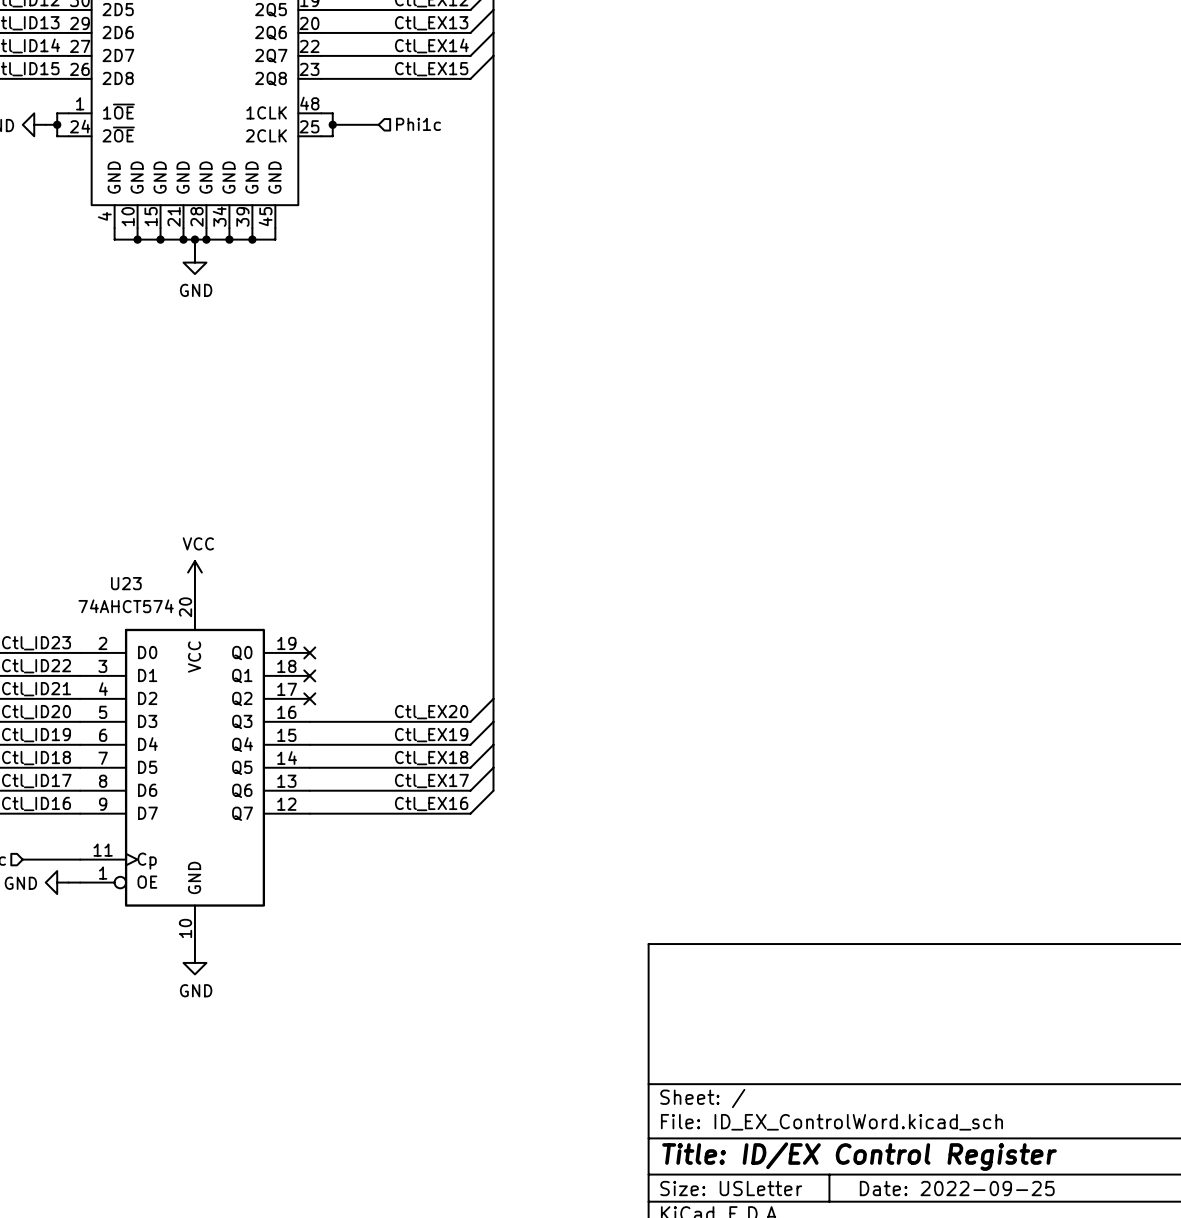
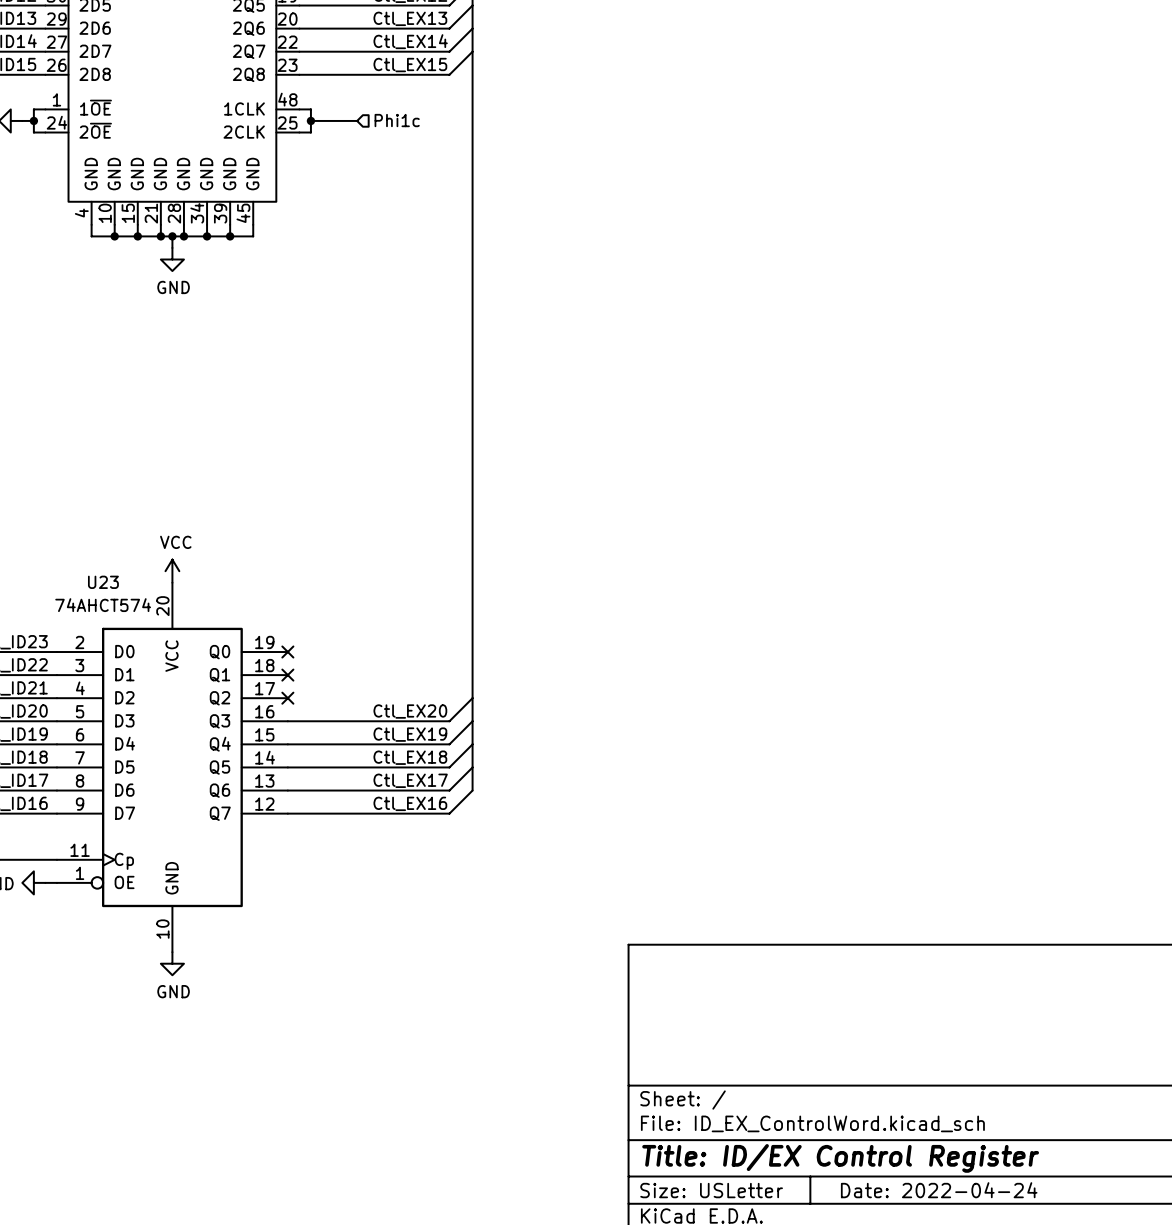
title block: Date: 2022-09-25 (957, 1188) -> Date: 2022-04-24 (939, 1190)

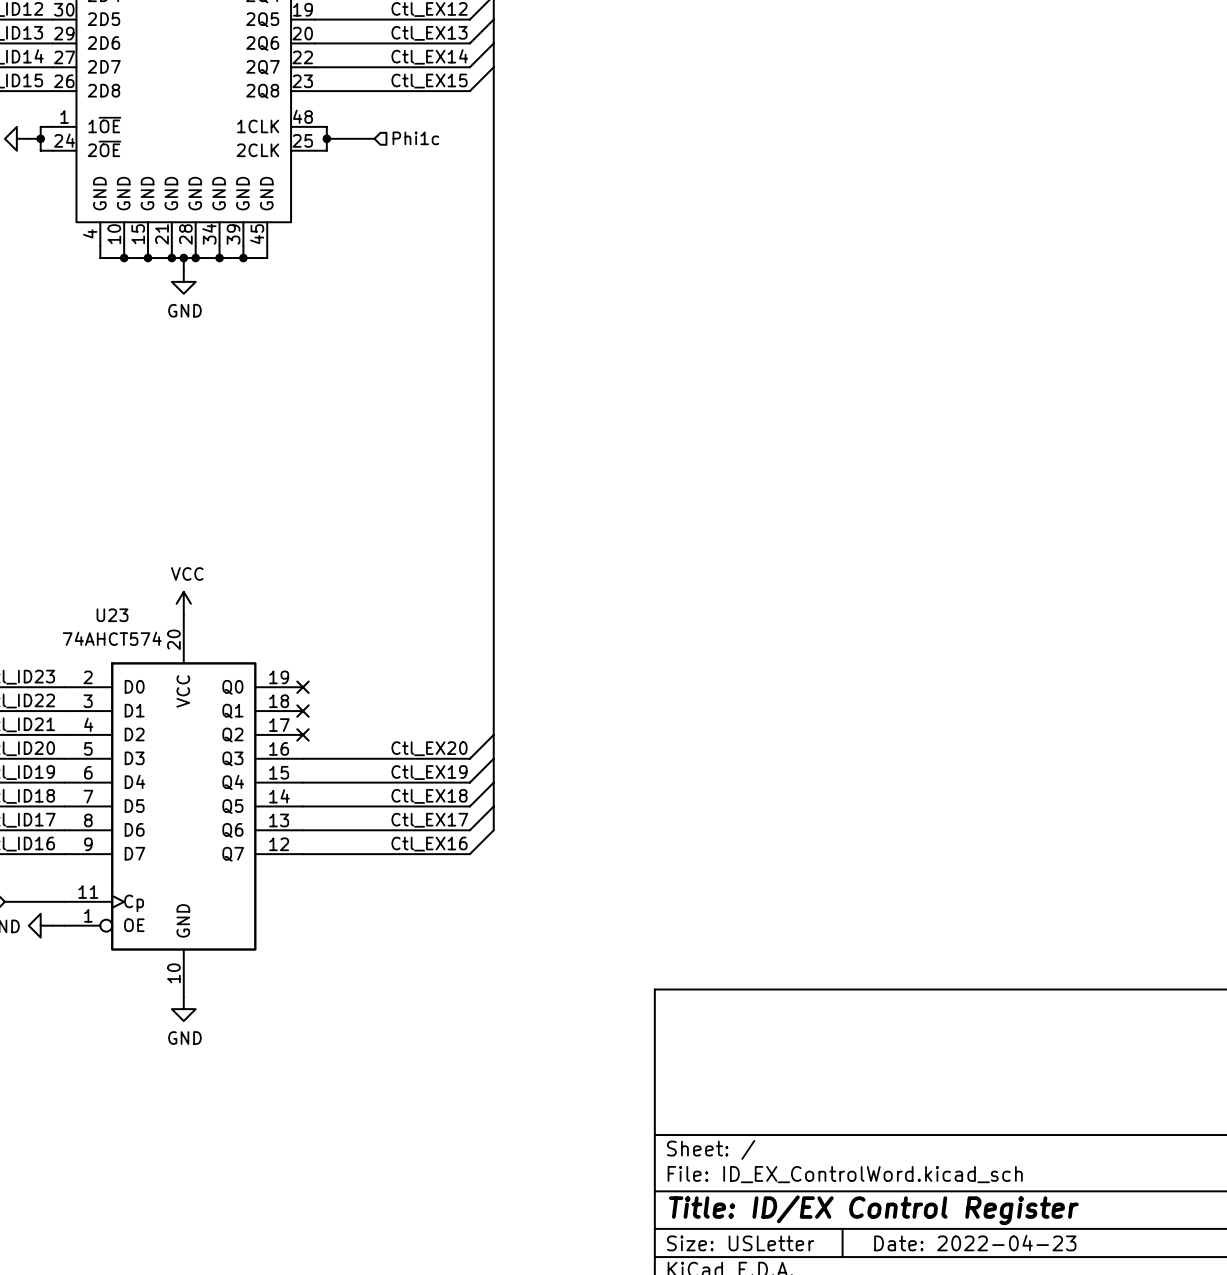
title block: Date: 2022-04-24 (939, 1190) -> Date: 2022-04-23 (975, 1243)

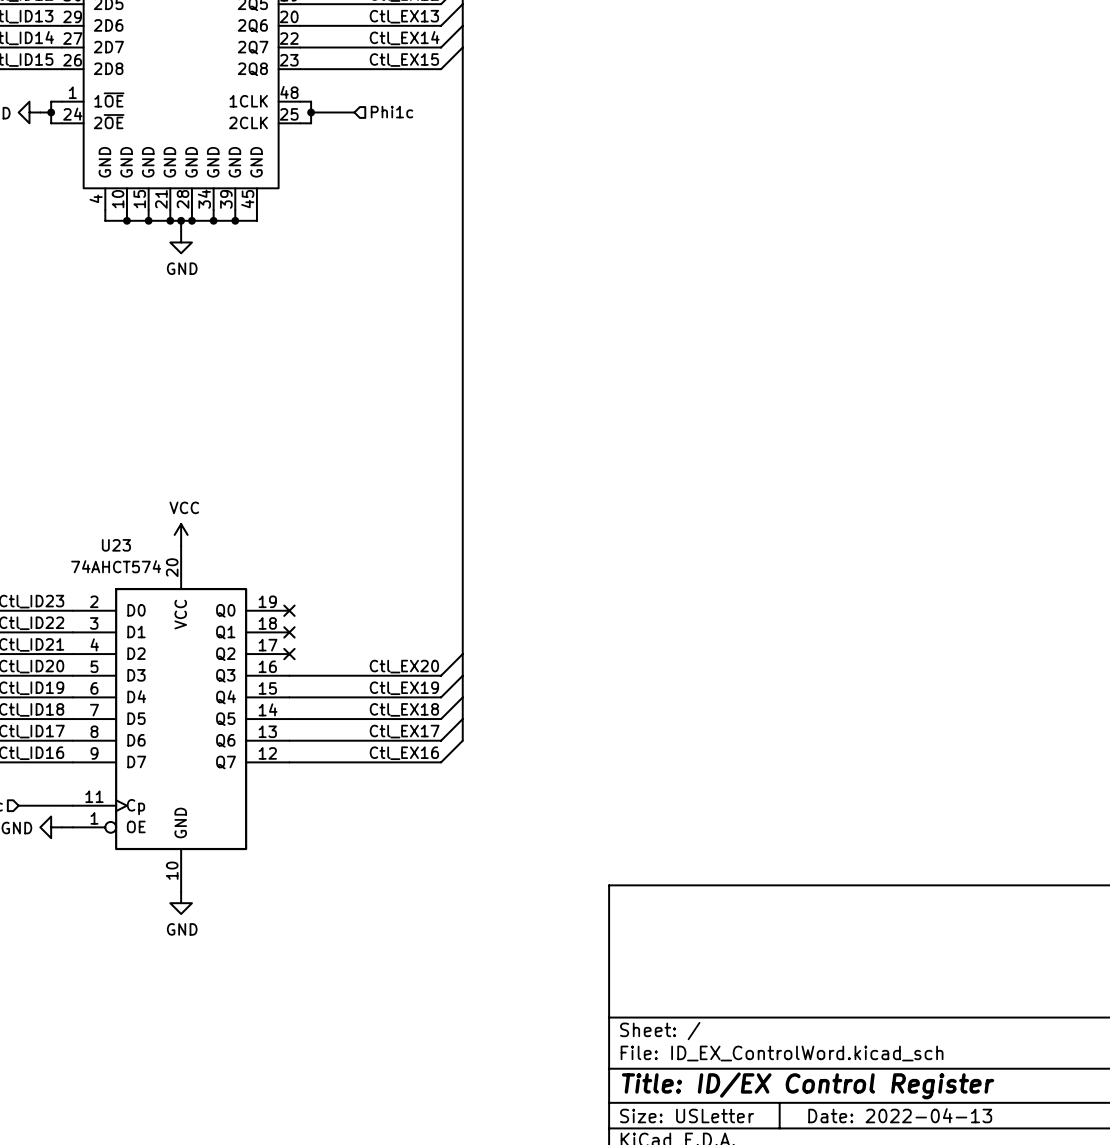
title block: Date: 2022-04-23 (975, 1243) -> Date: 2022-04-13 (900, 1115)

